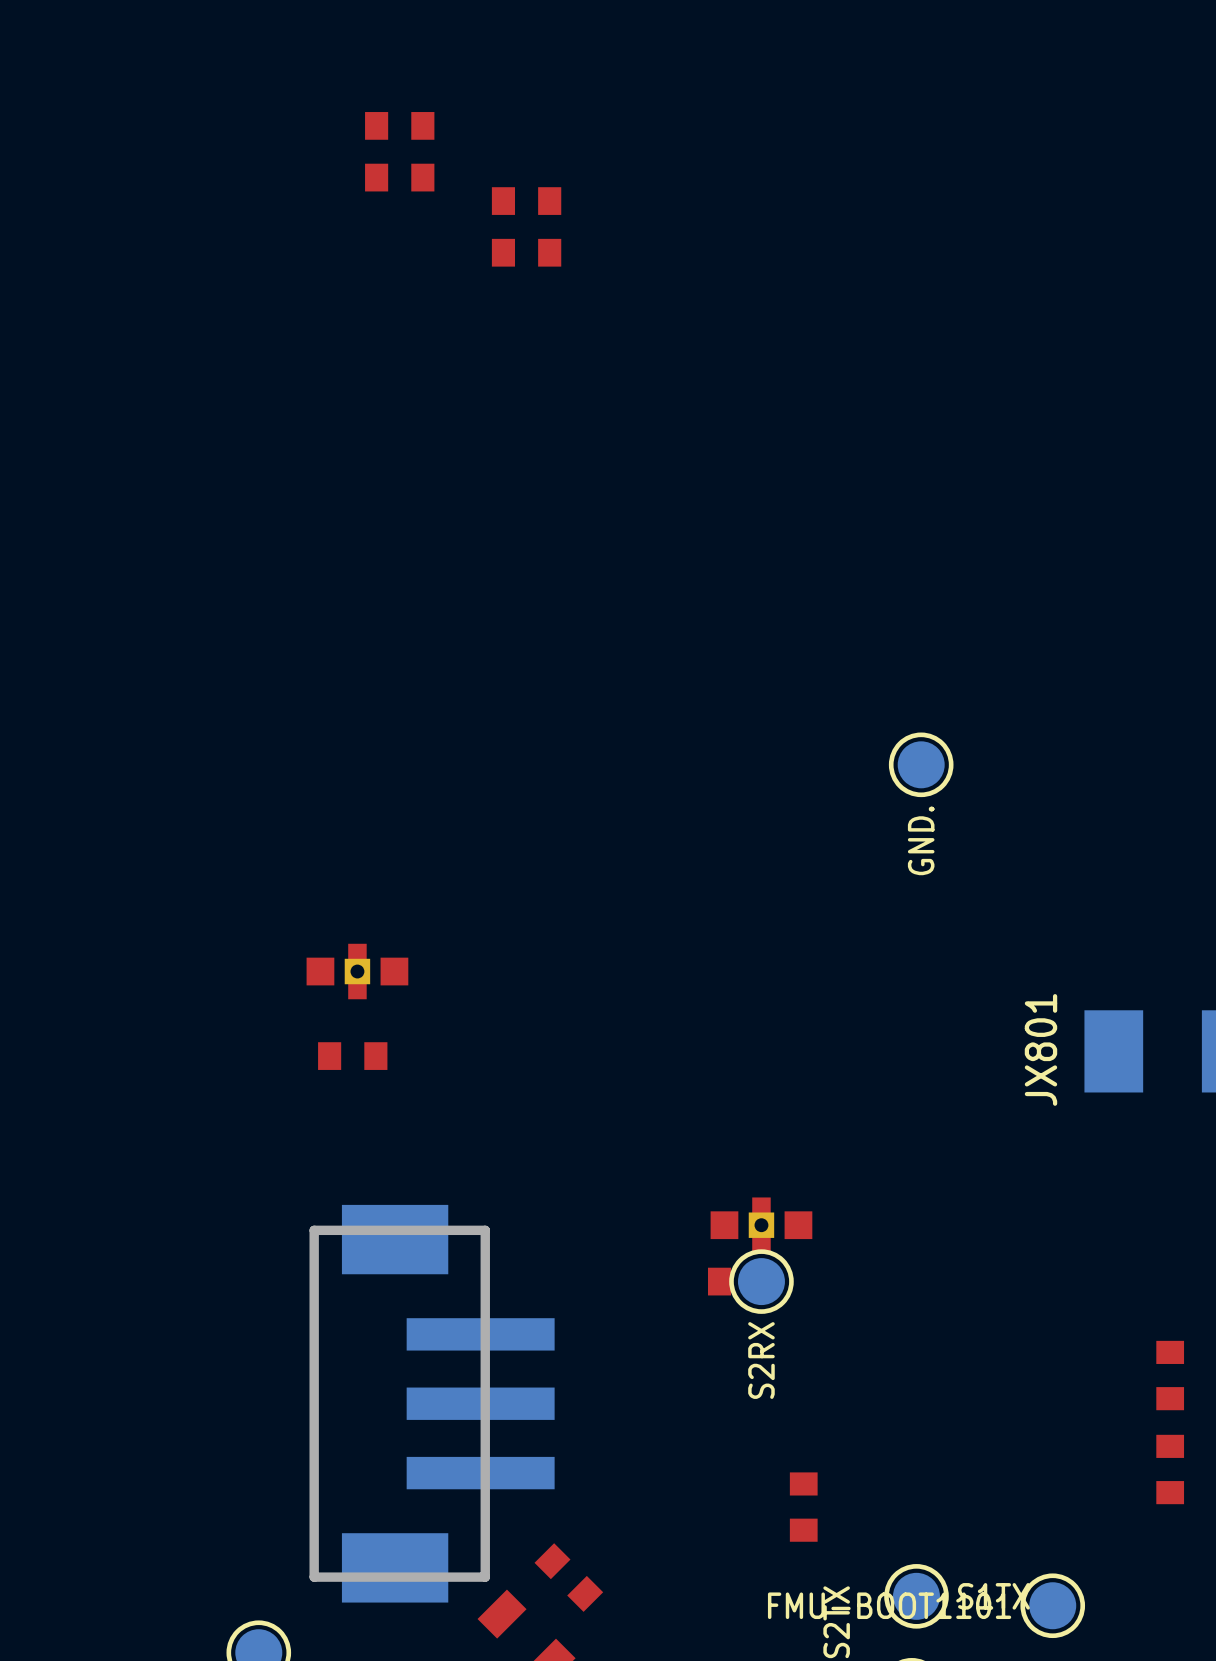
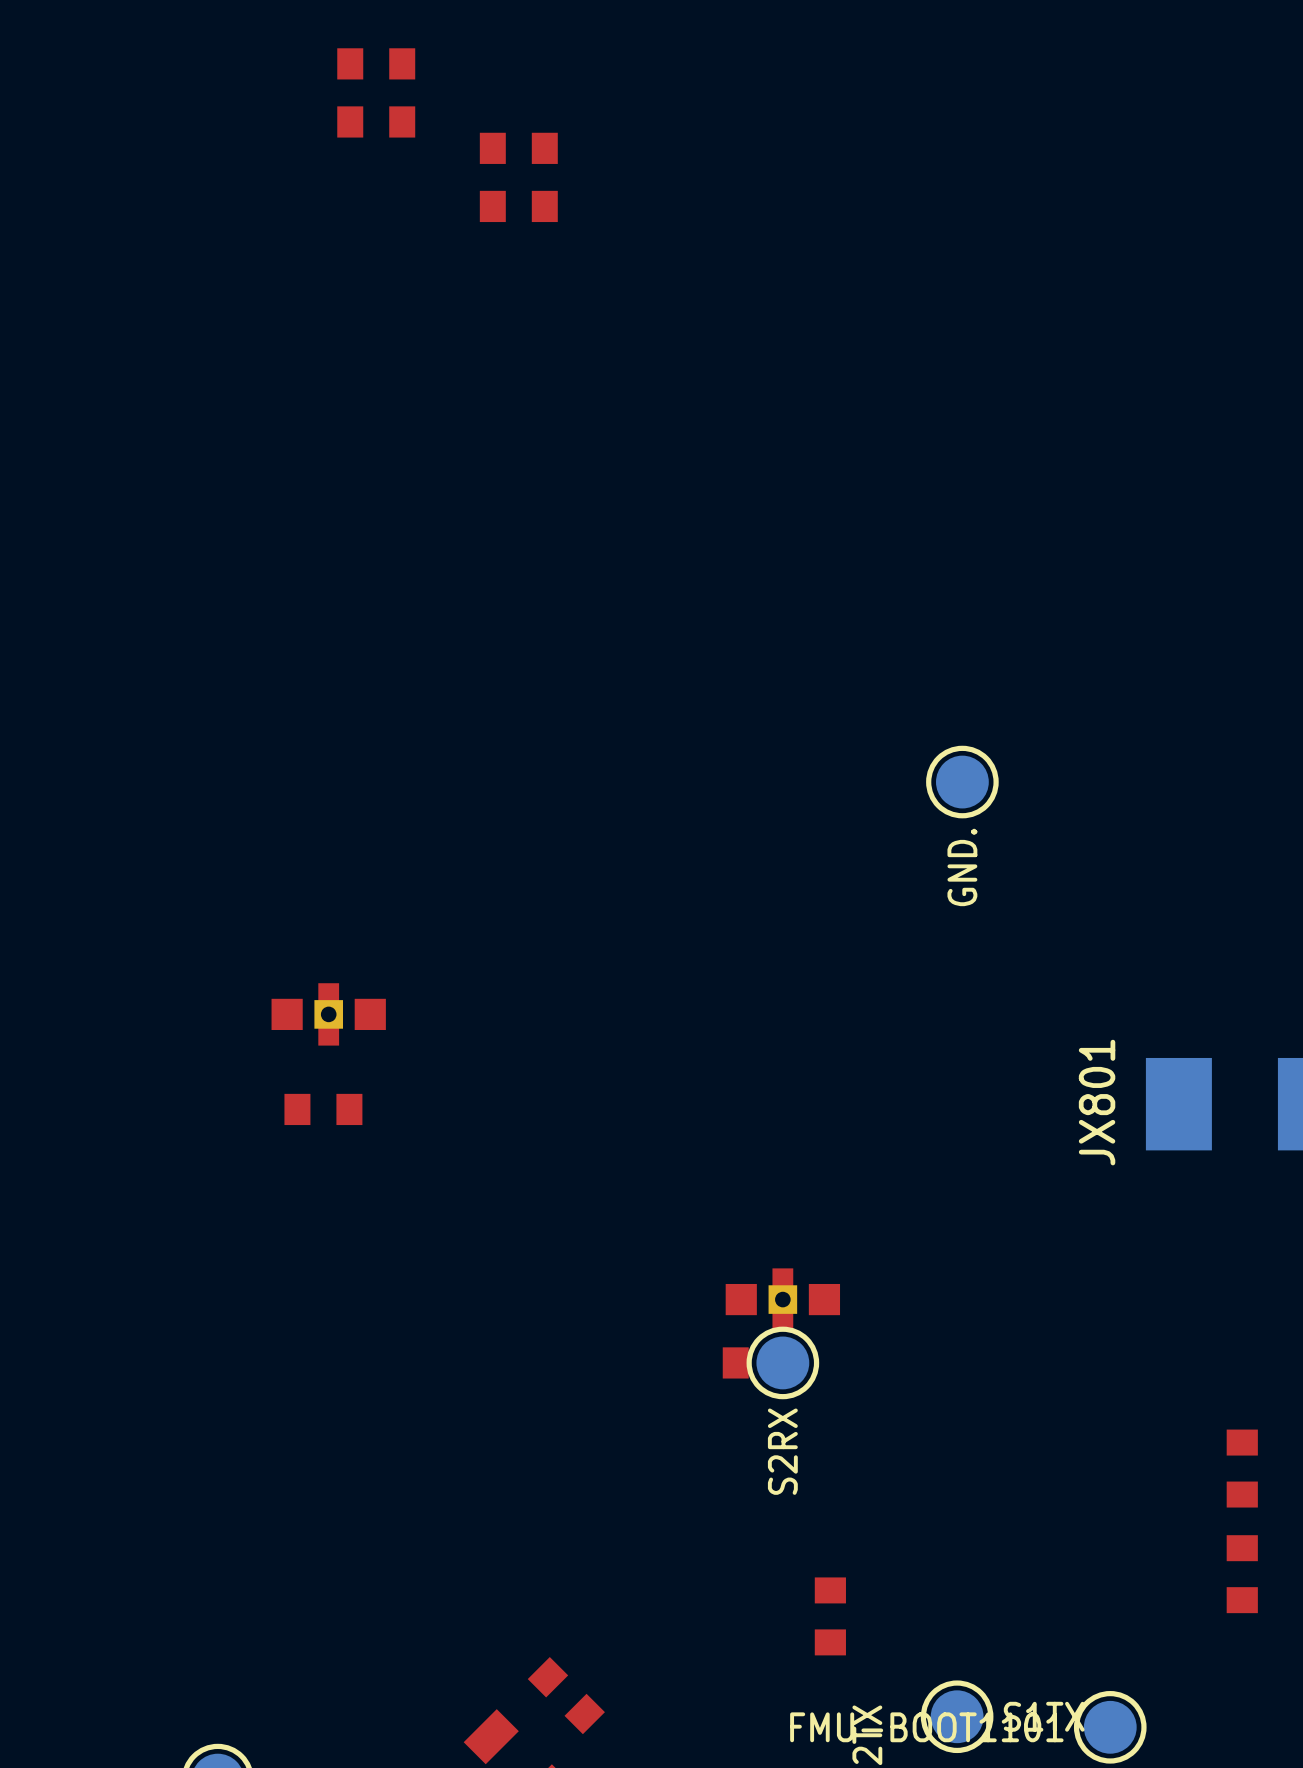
part: (432, 1403) -> none

